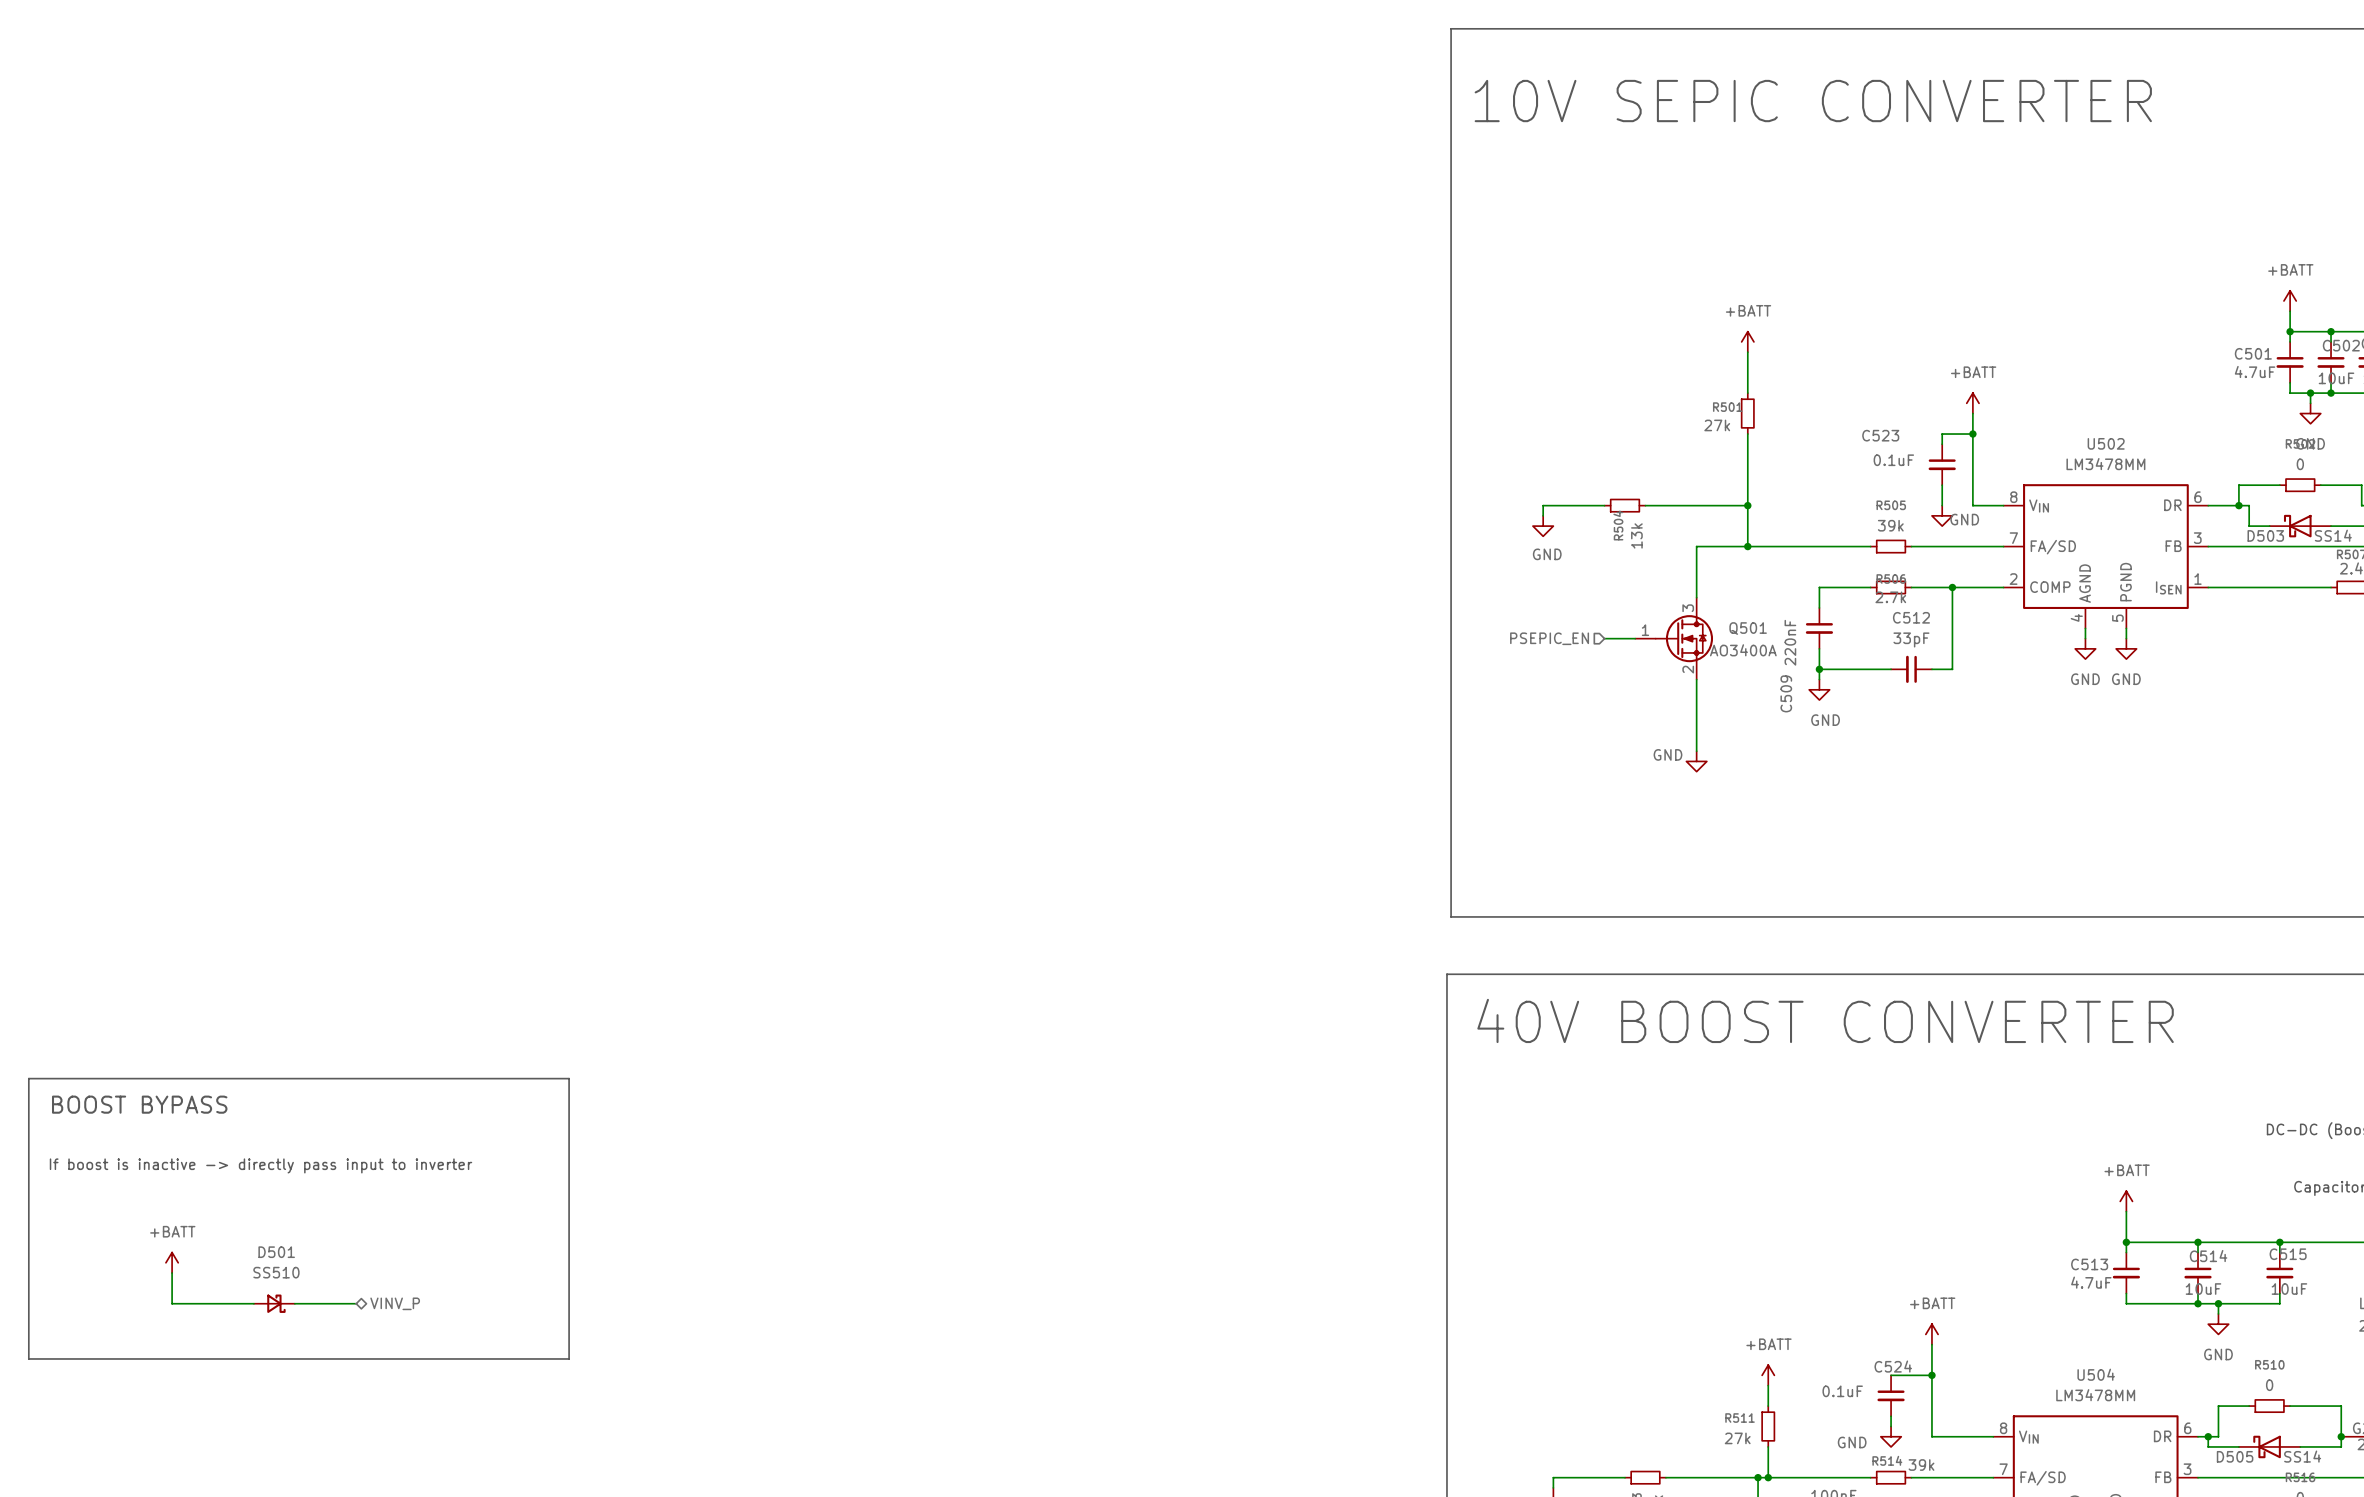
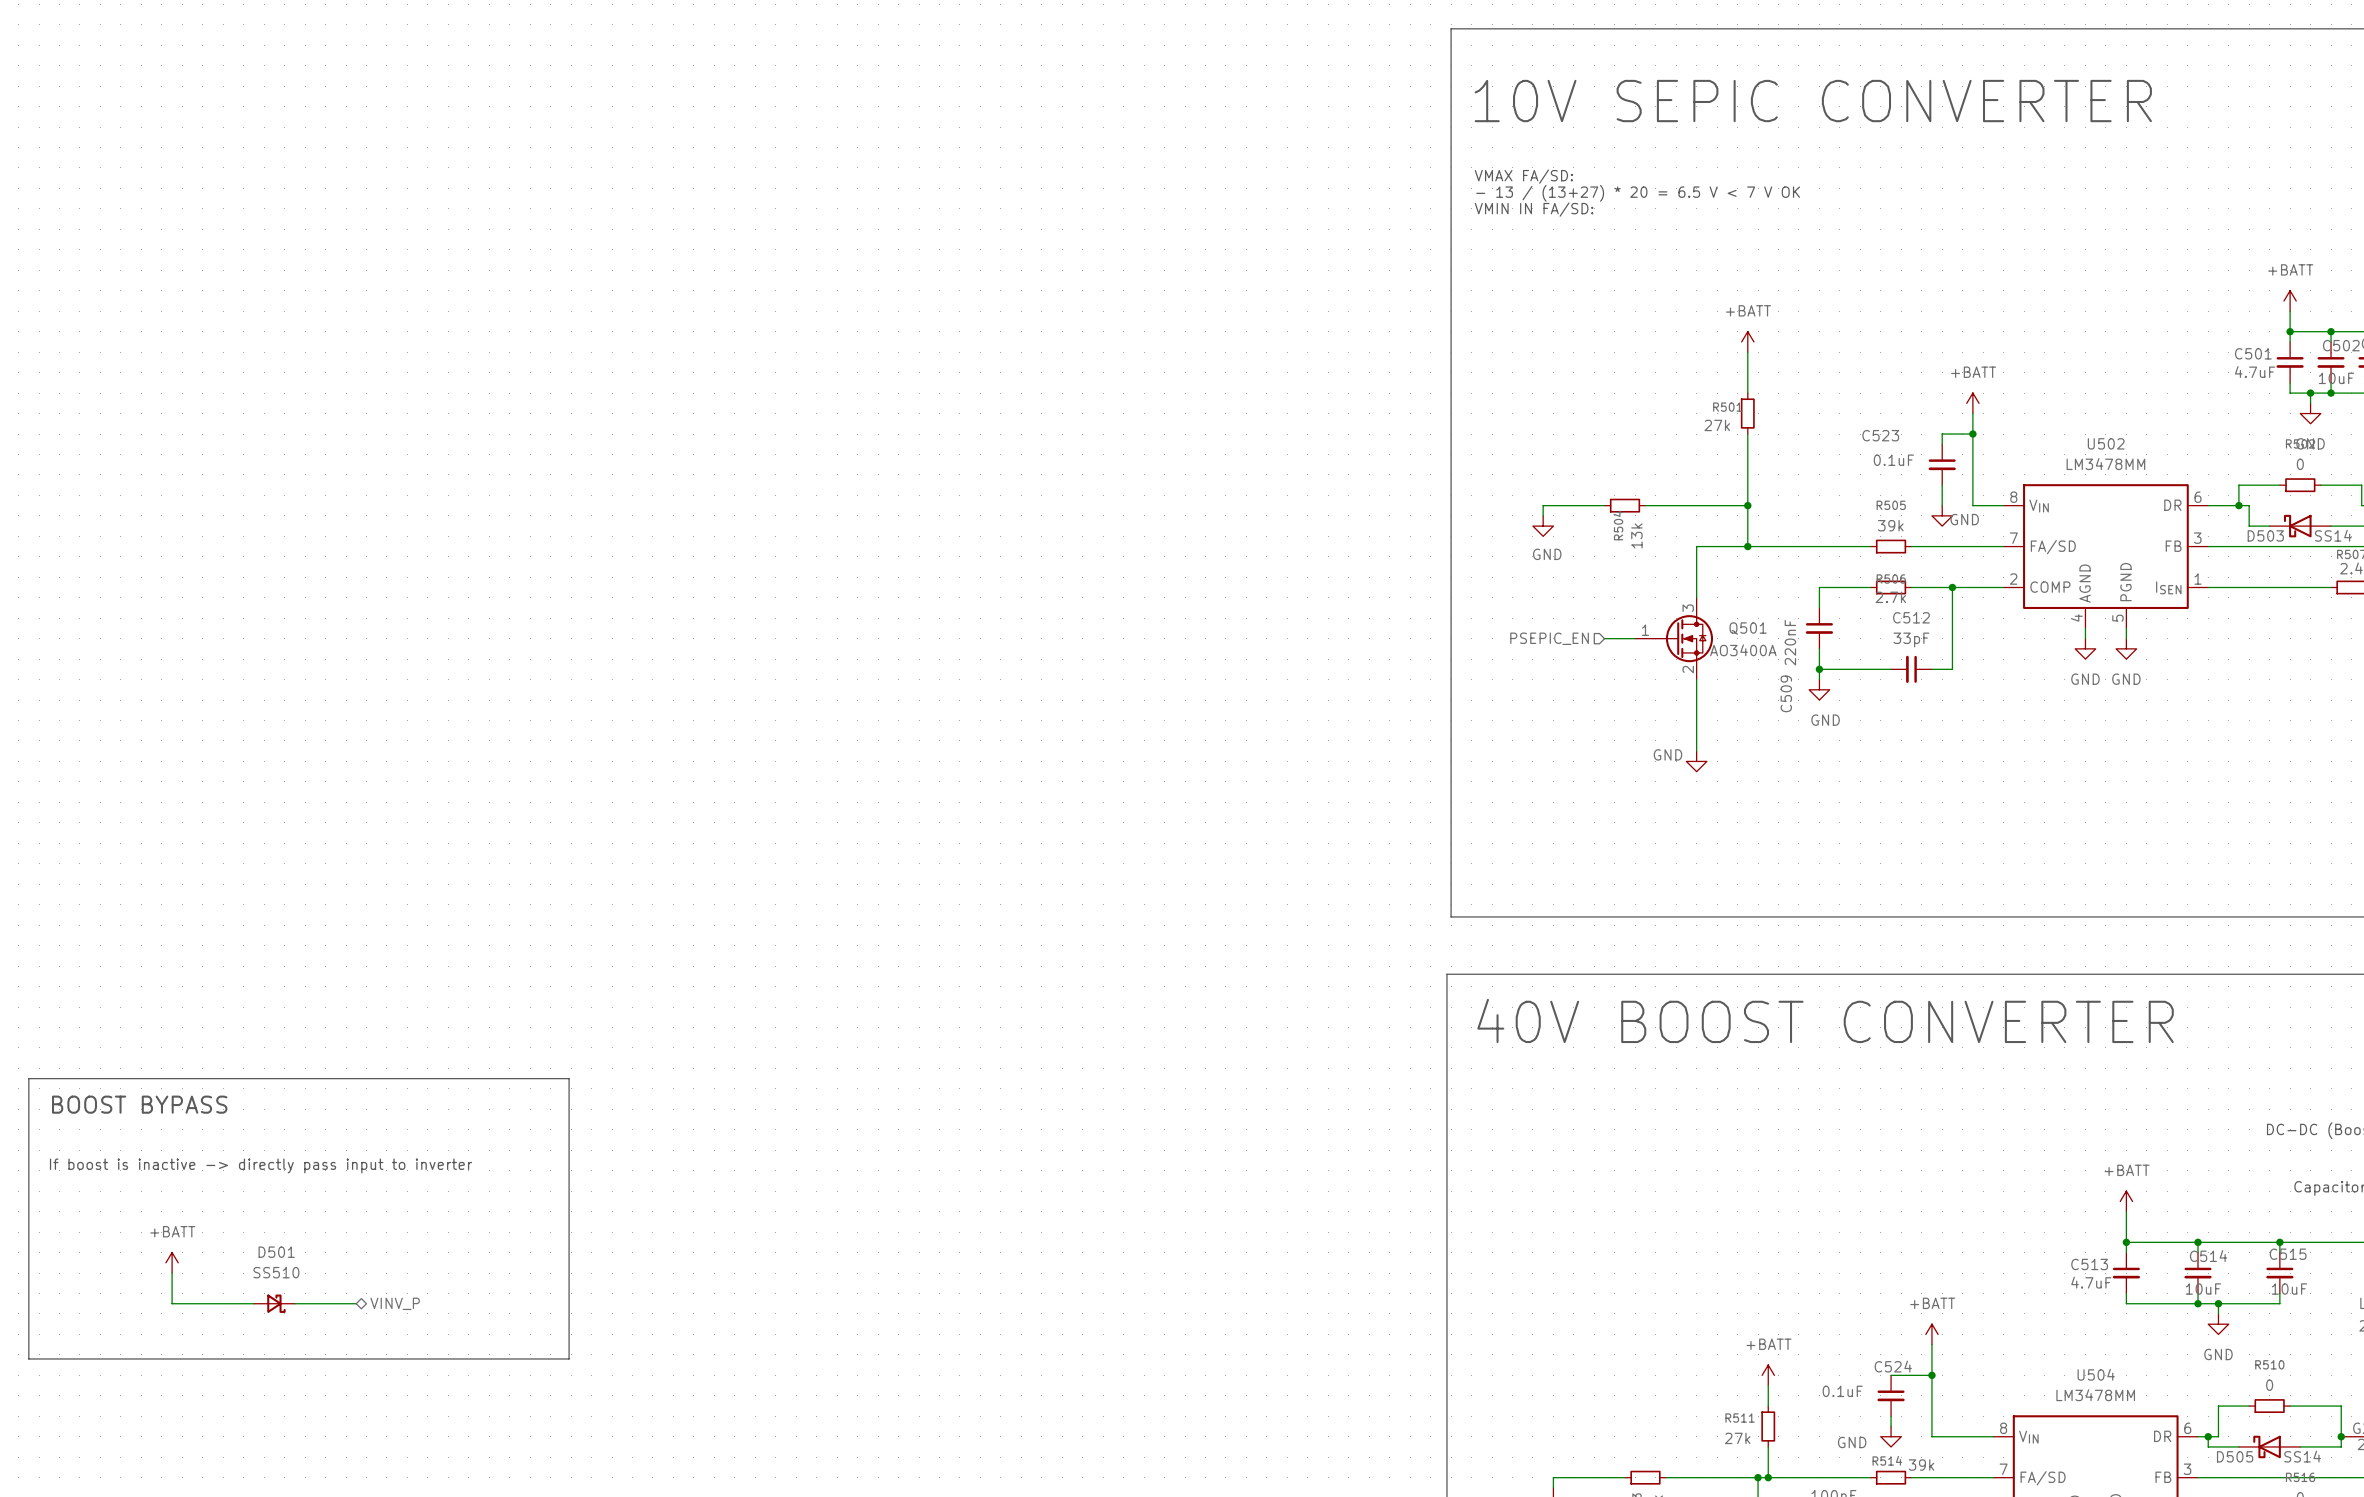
text: none -> VMAX FA/SD: (1523, 176)
text: none -> - 13 / (13+27) * 20 = 6.5 V < 7 V OK (1638, 193)
text: none -> VMIN IN FA/SD: (1534, 209)

